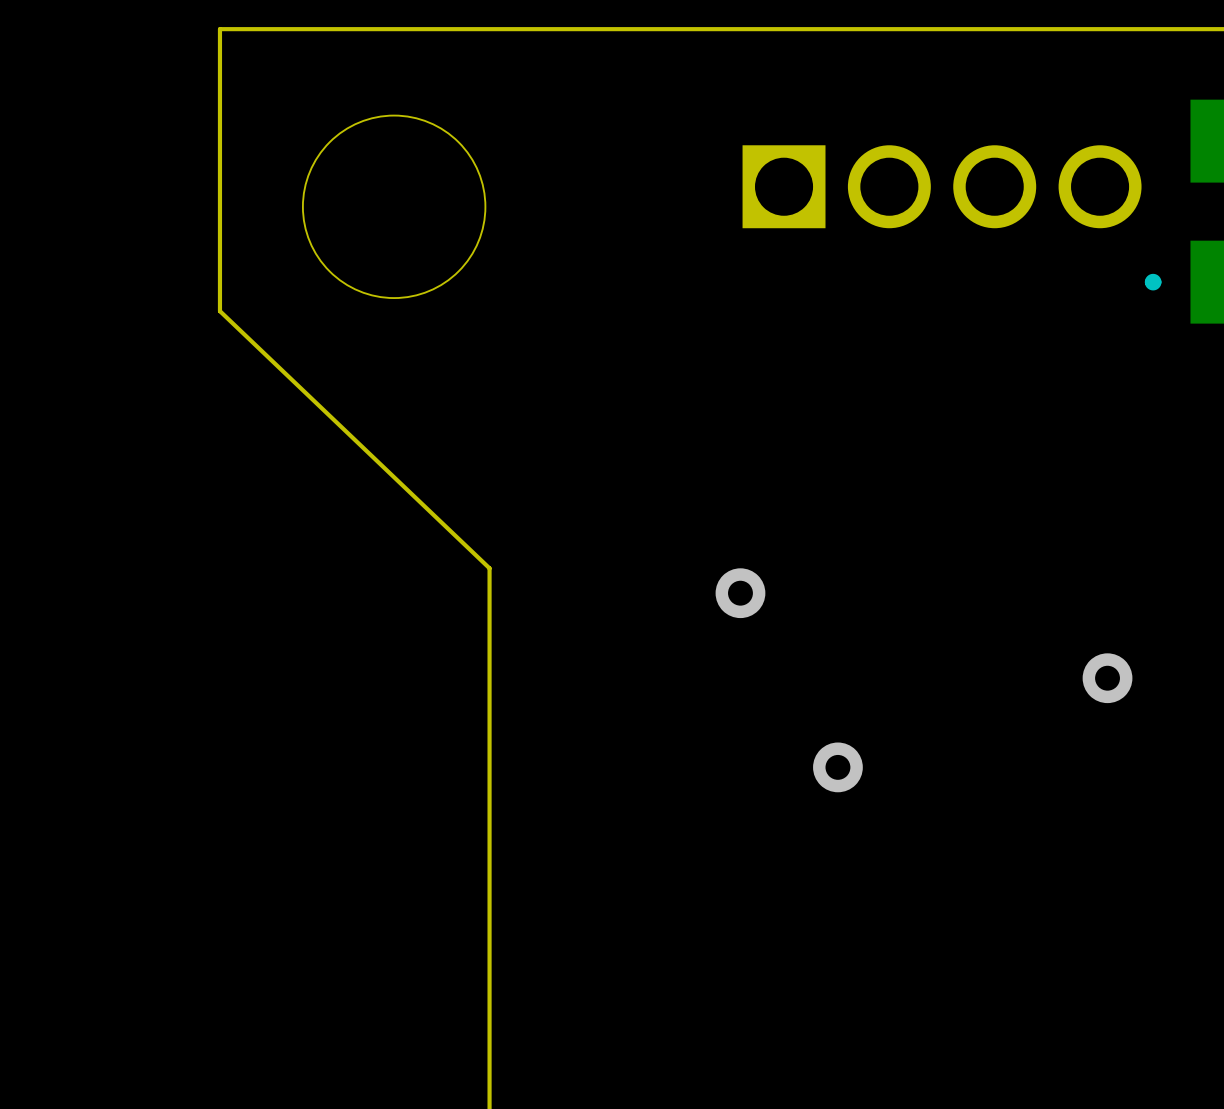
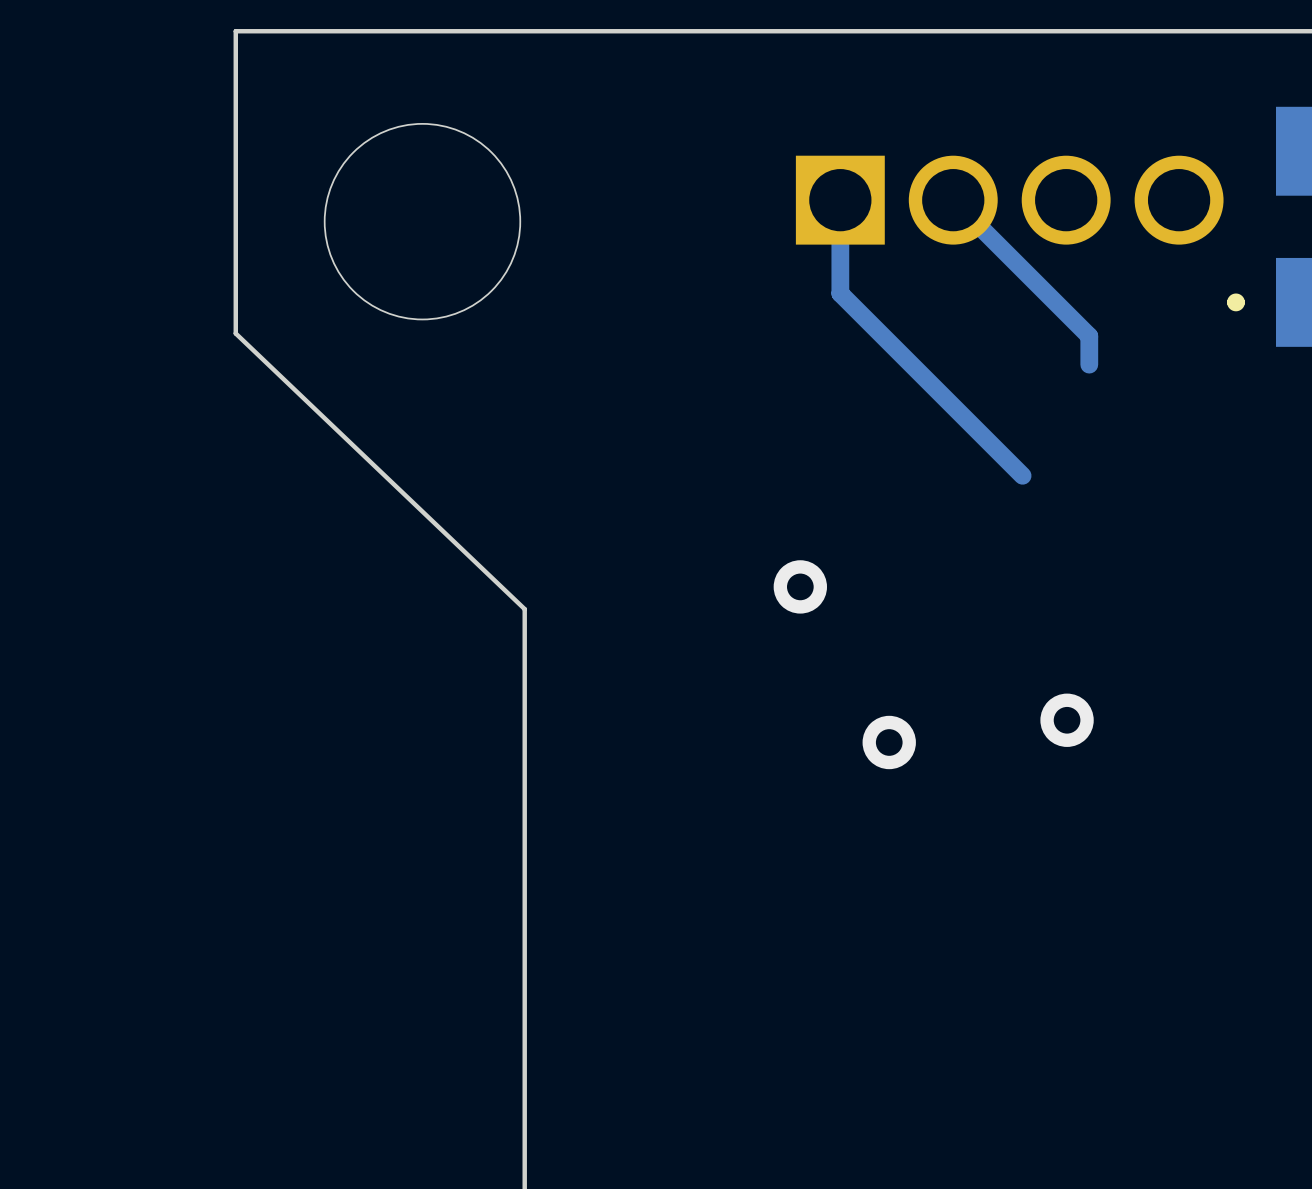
track: none -> (840, 200) (840, 293) (1022, 475)
track: none -> (953, 200) (1089, 336) (1089, 364)
via position: (740, 593) -> (800, 586)
via: none -> (1067, 720)
via: (1107, 678) -> none
via: none -> (889, 742)
via: (837, 767) -> none

